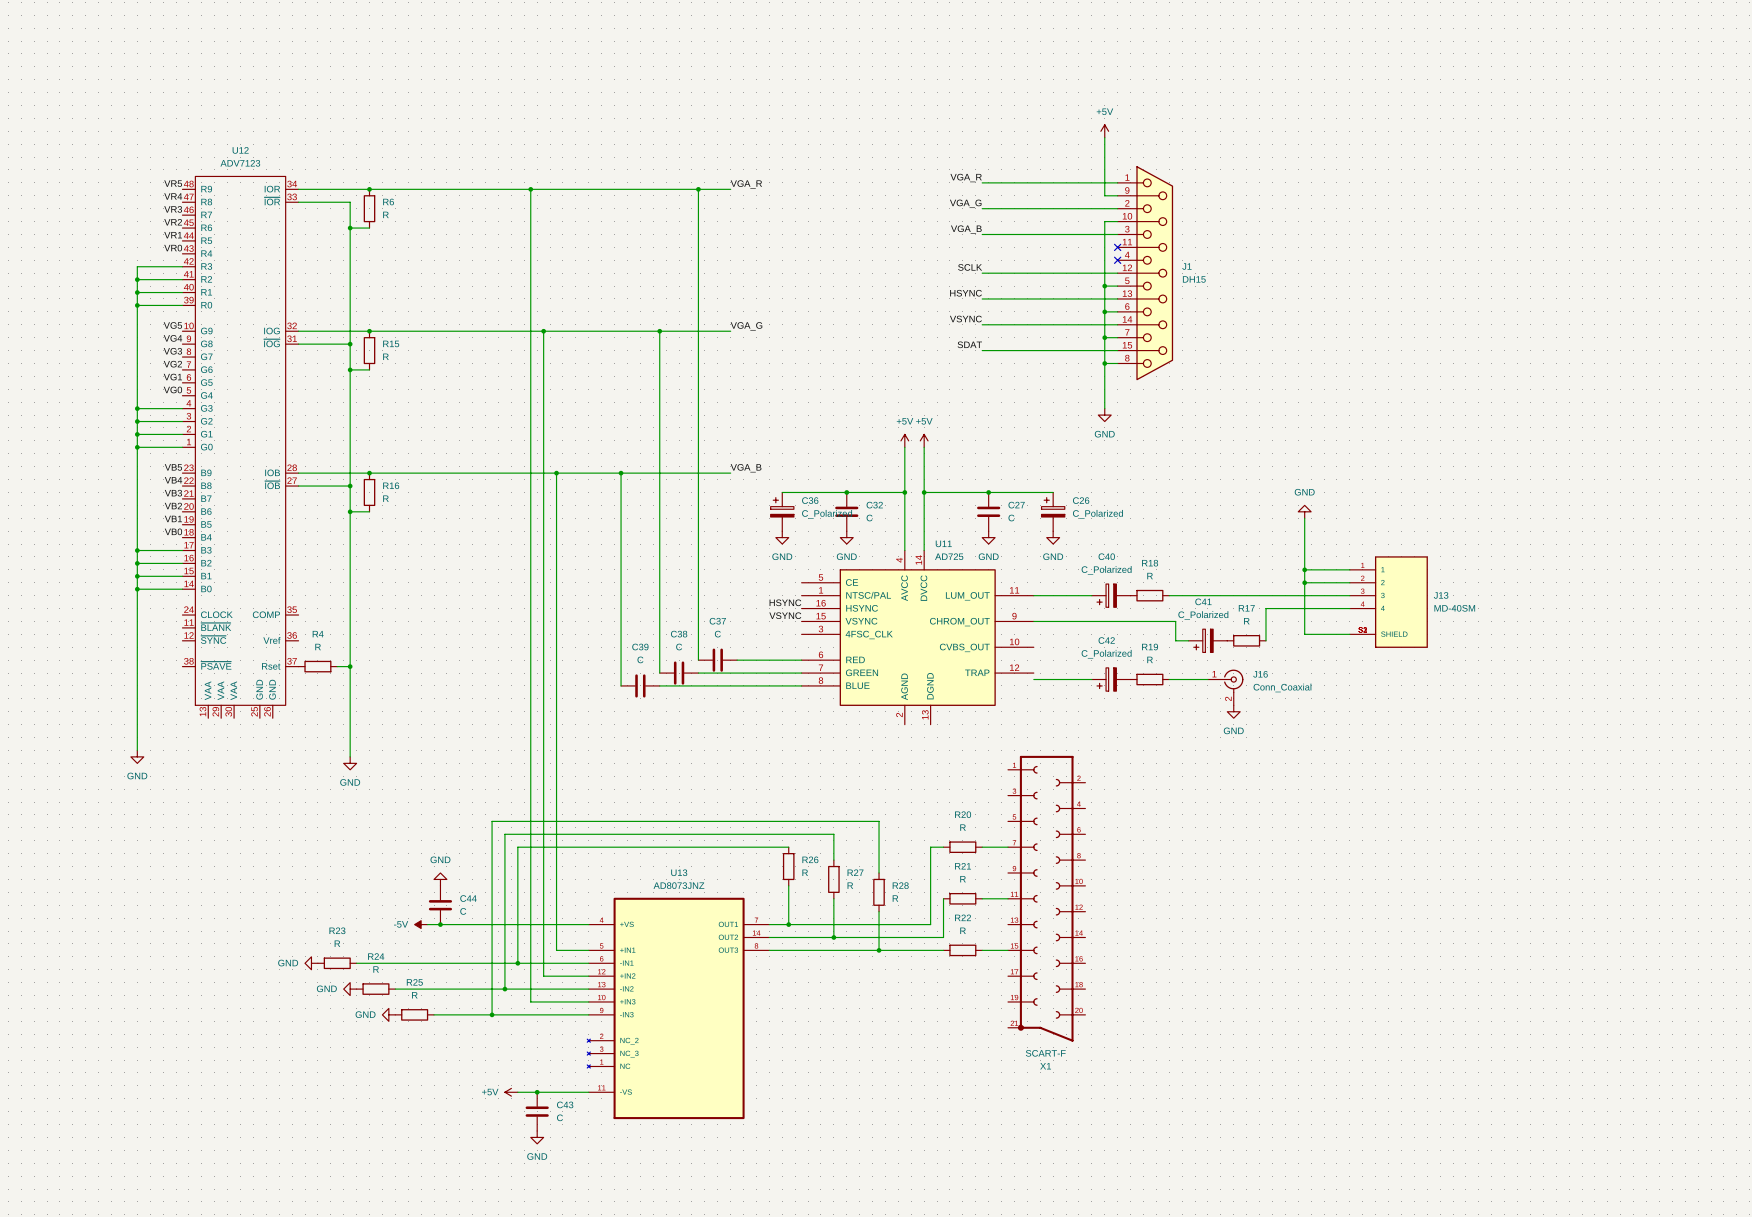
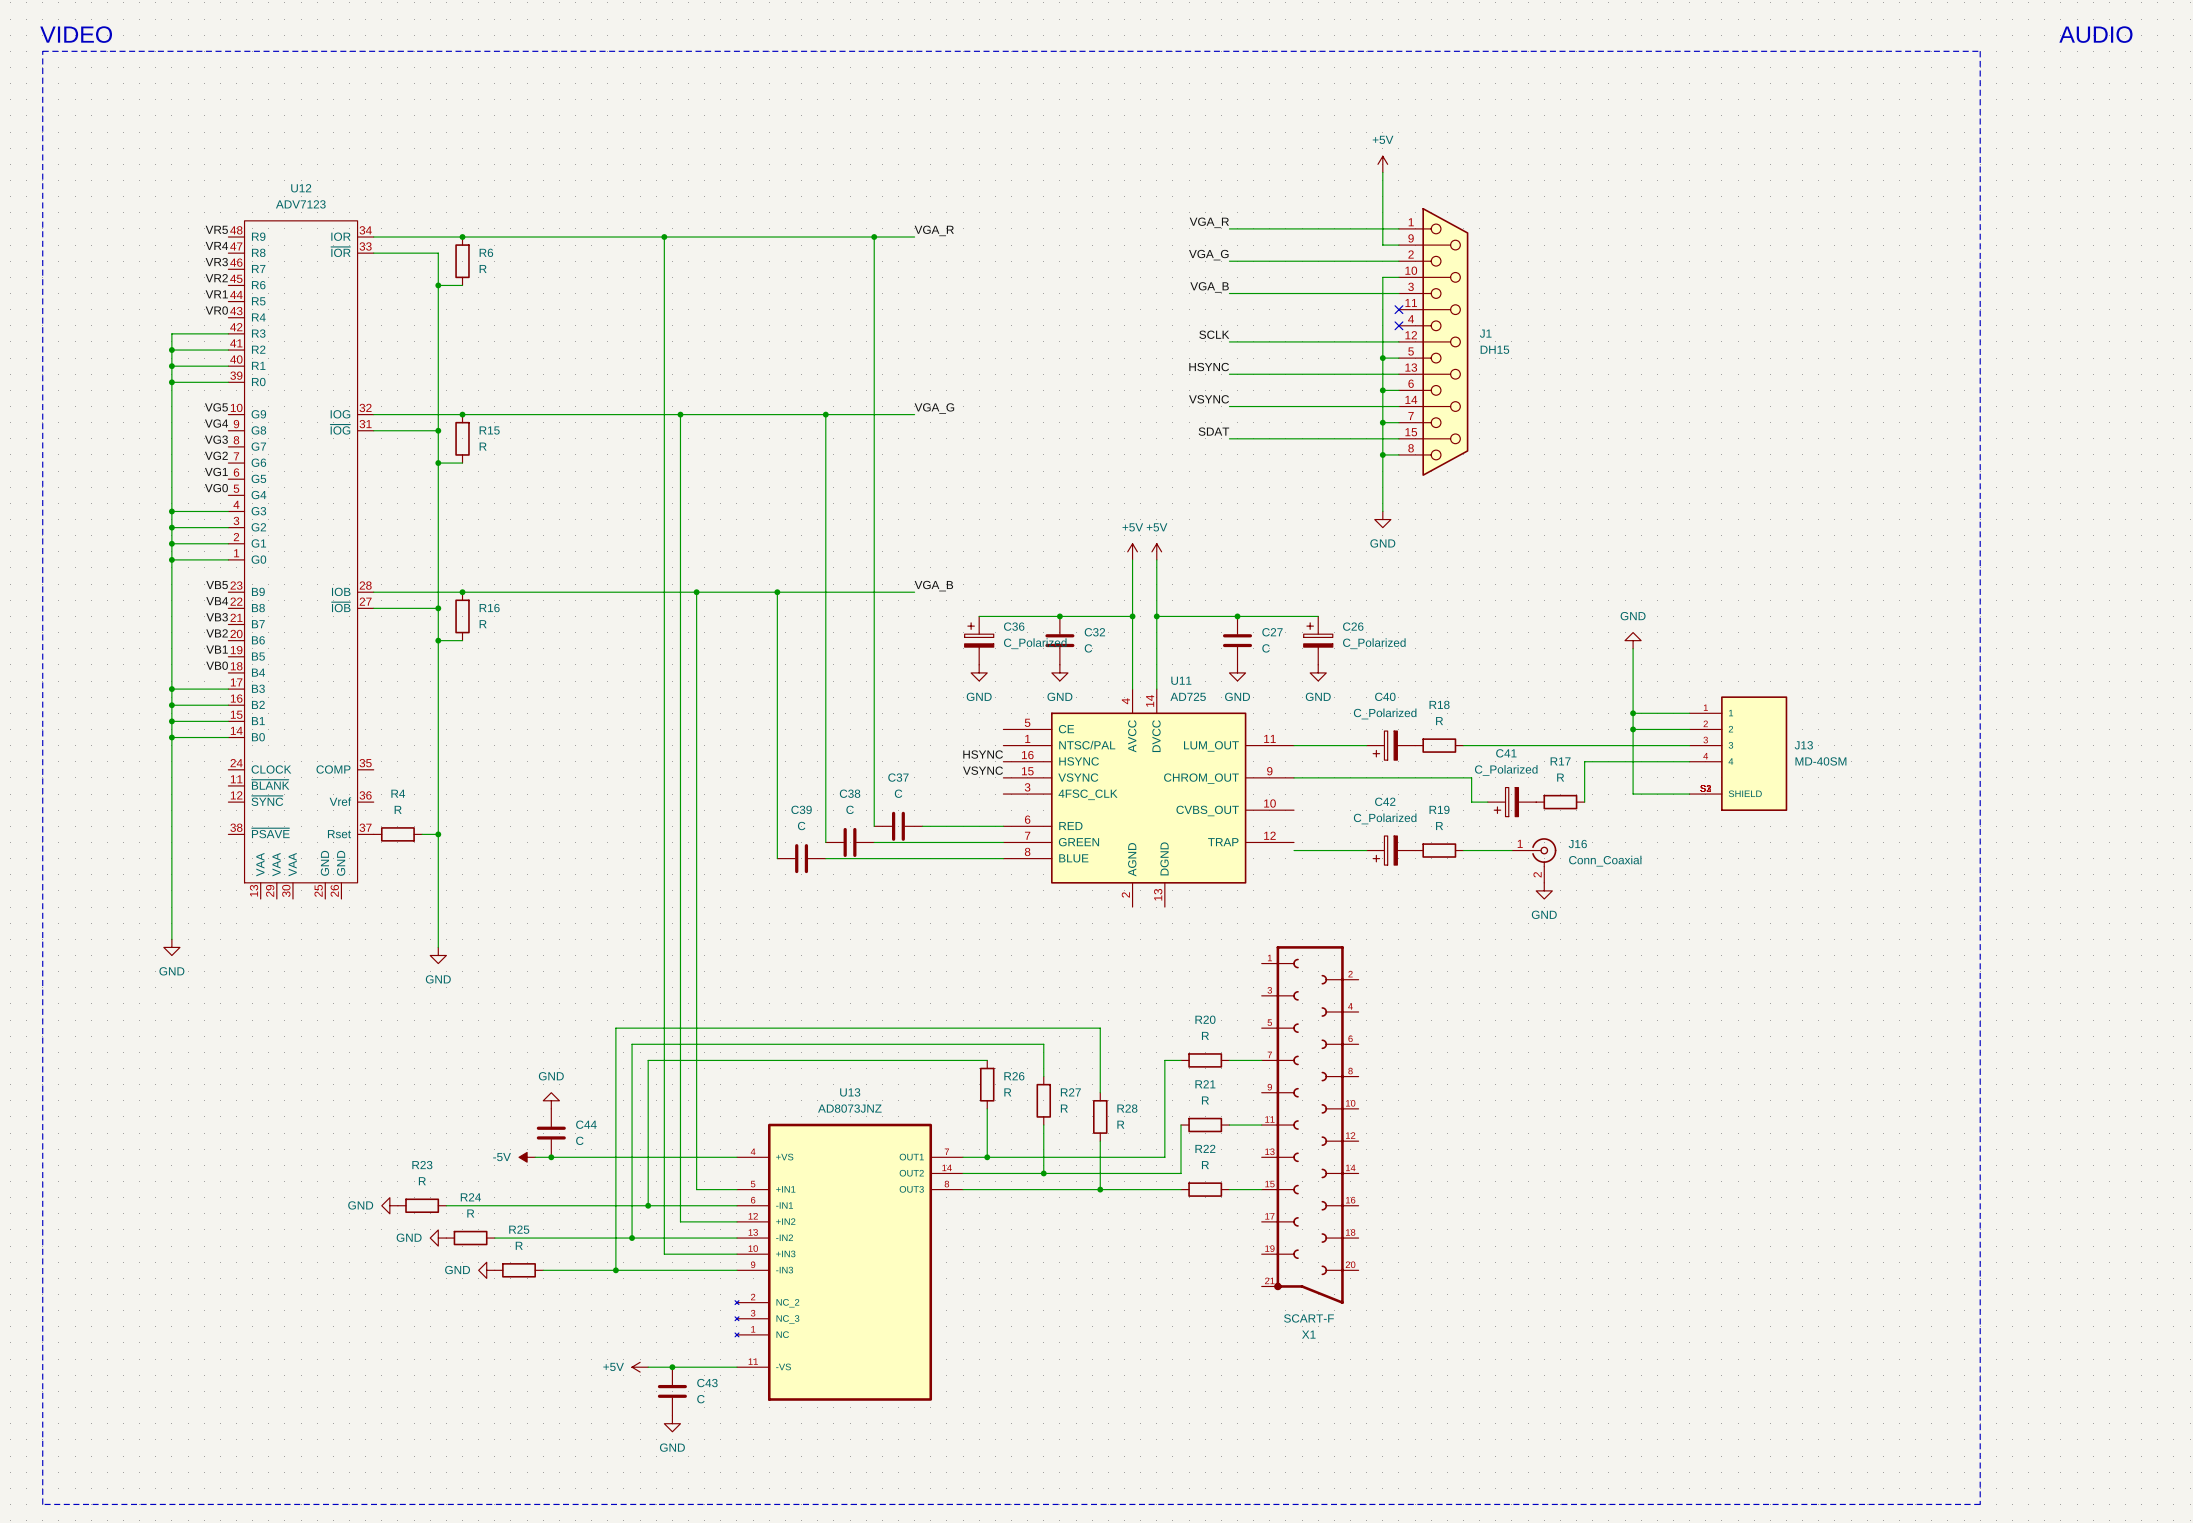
text: none -> VIDEO (76, 34)
text: none -> AUDIO (2095, 34)
line: none -> (42, 51) (1980, 51) (1980, 1504) (42, 1504) (42, 51)

